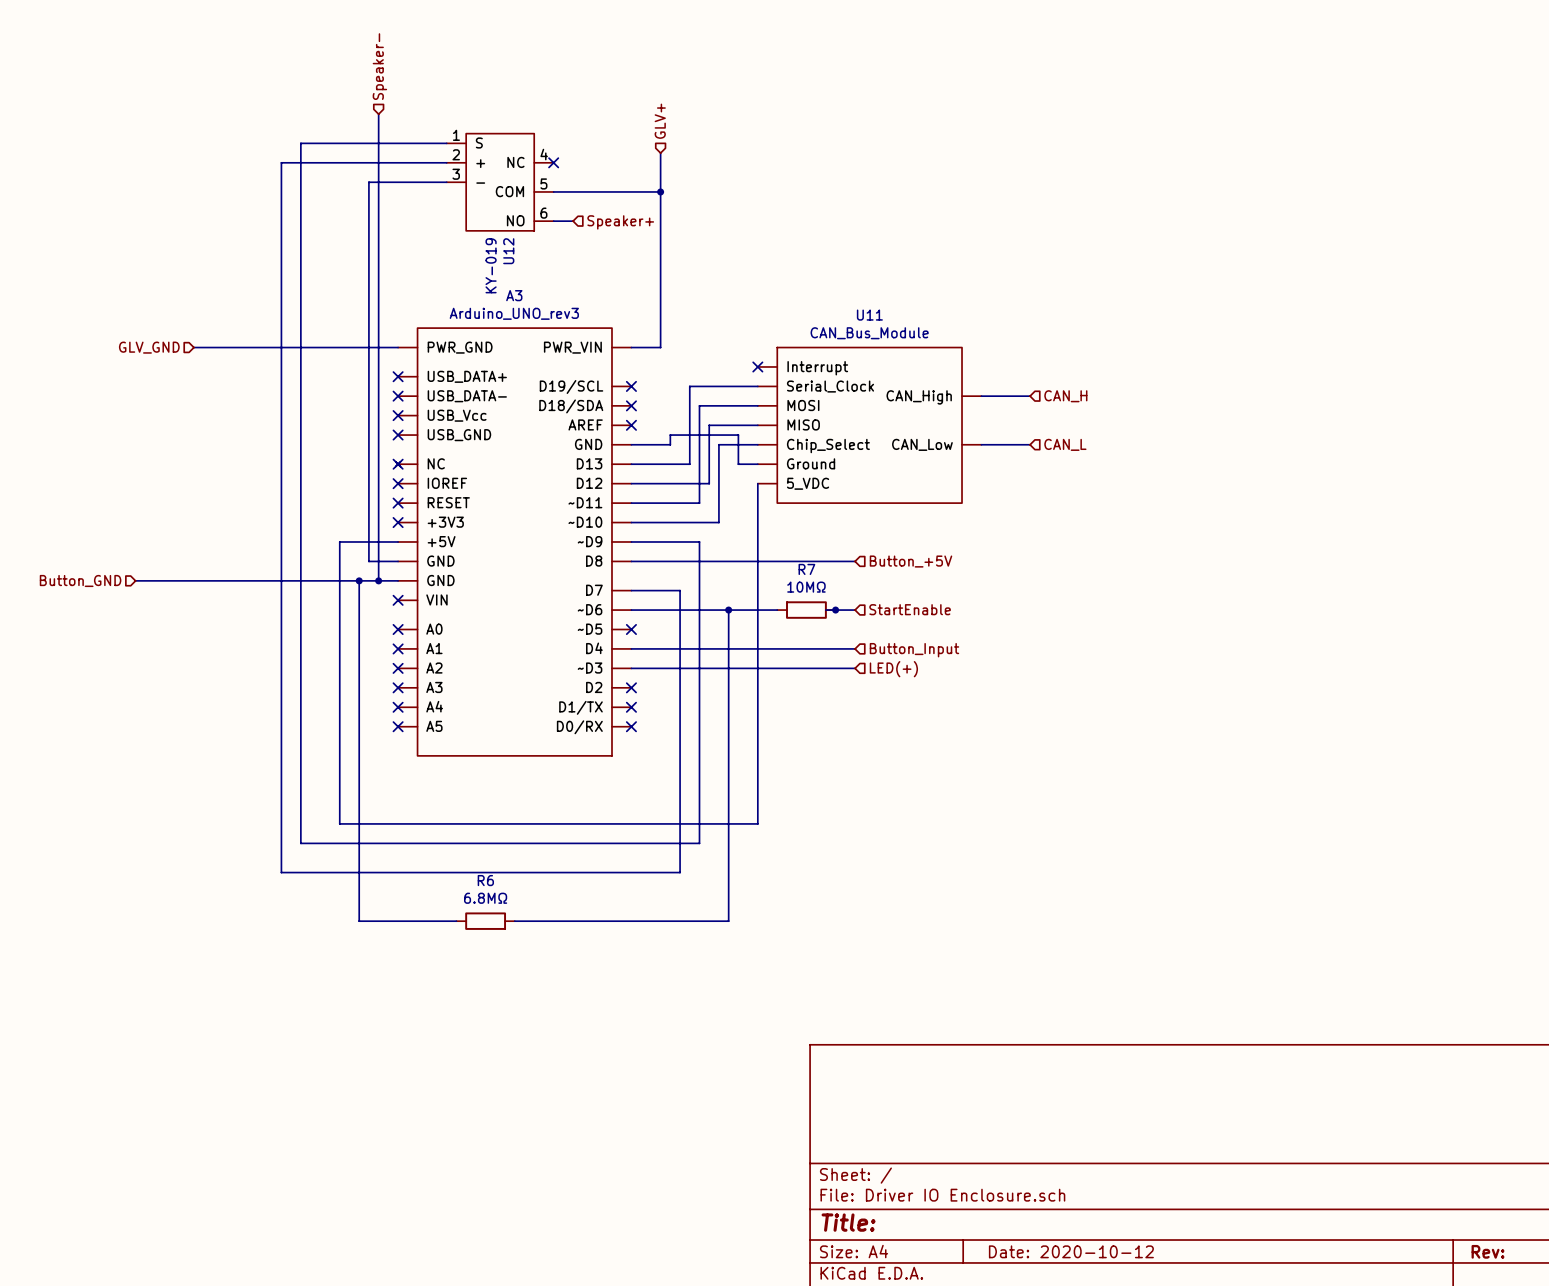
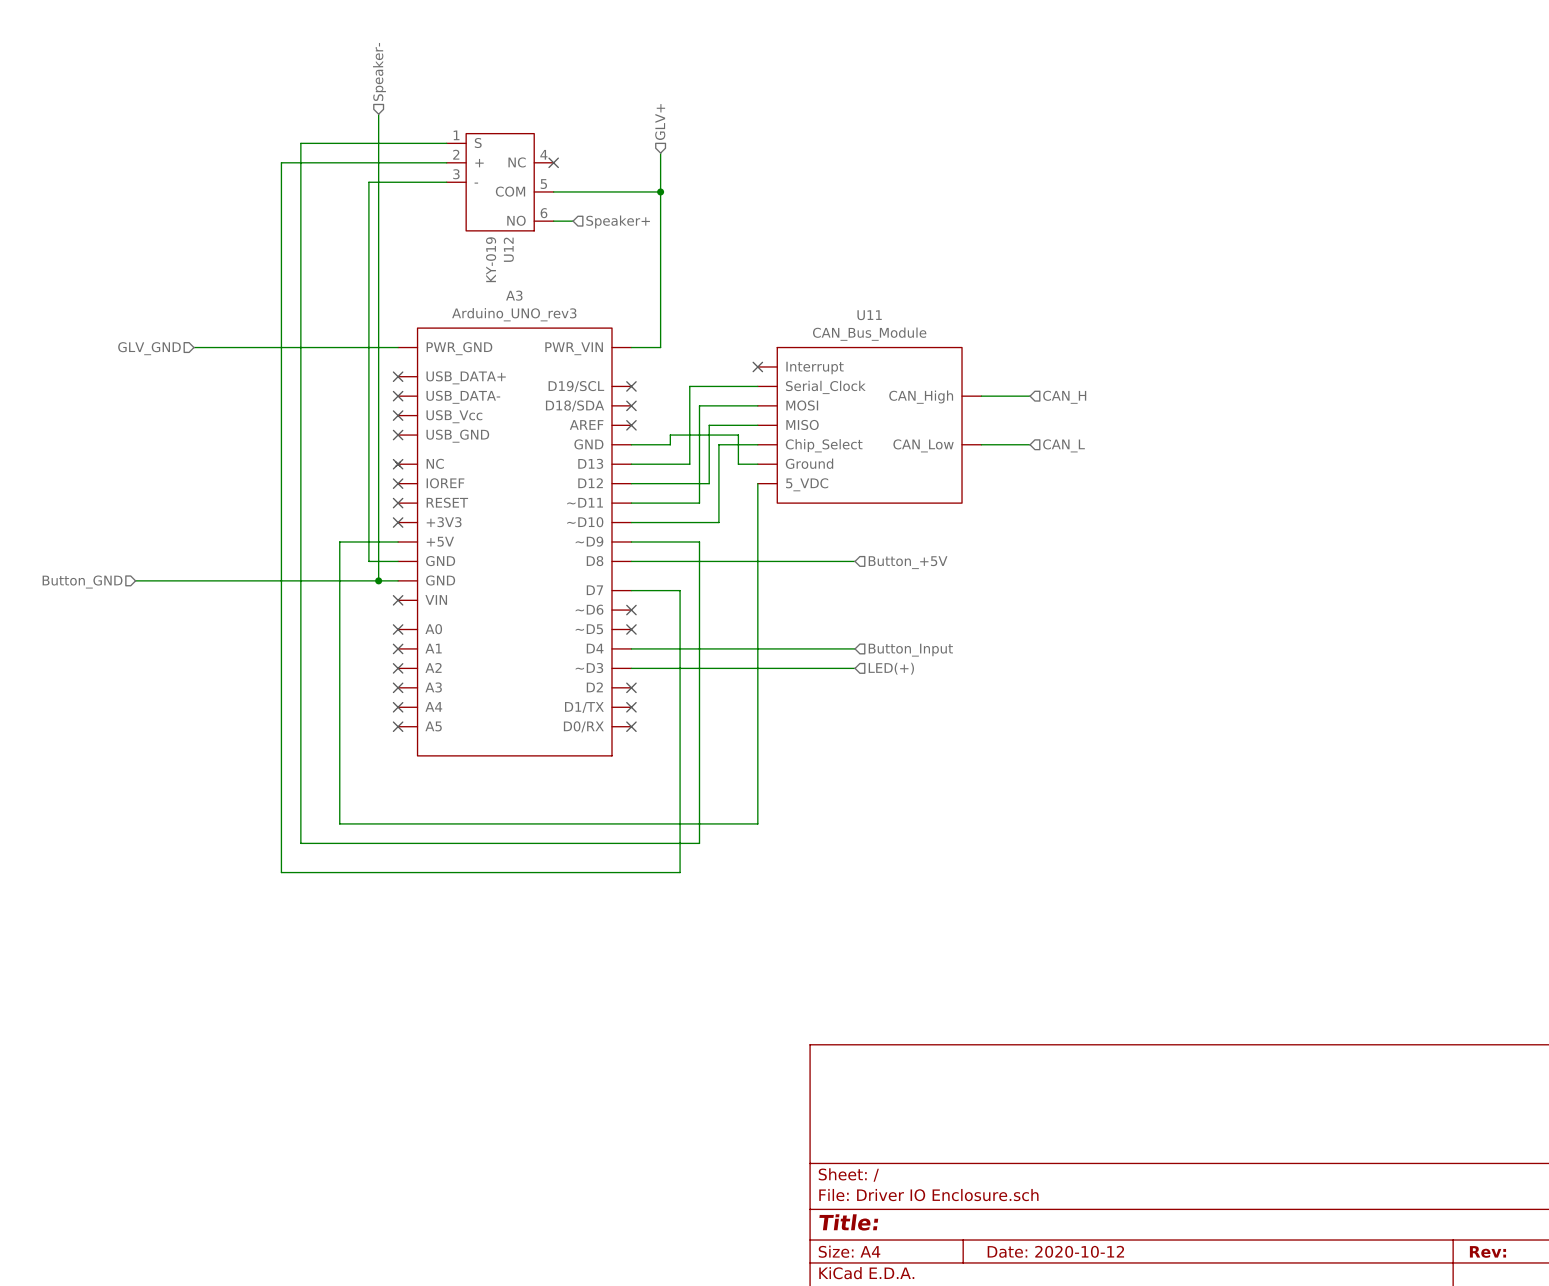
wire: (359, 580) (359, 921) (456, 921) -> none
junction: (359, 580) -> none
hierarchical label: StartEnable (910, 609) -> none
wire: (631, 610) (777, 610) -> none
no-connect mark: none -> (631, 610)
wire: (728, 610) (728, 921) (514, 921) -> none
junction: (728, 610) -> none
R7: 10MΩ (806, 610) -> none
wire: (825, 610) (855, 610) -> none
junction: (835, 610) -> none
R6: 6.8MΩ (485, 921) -> none

